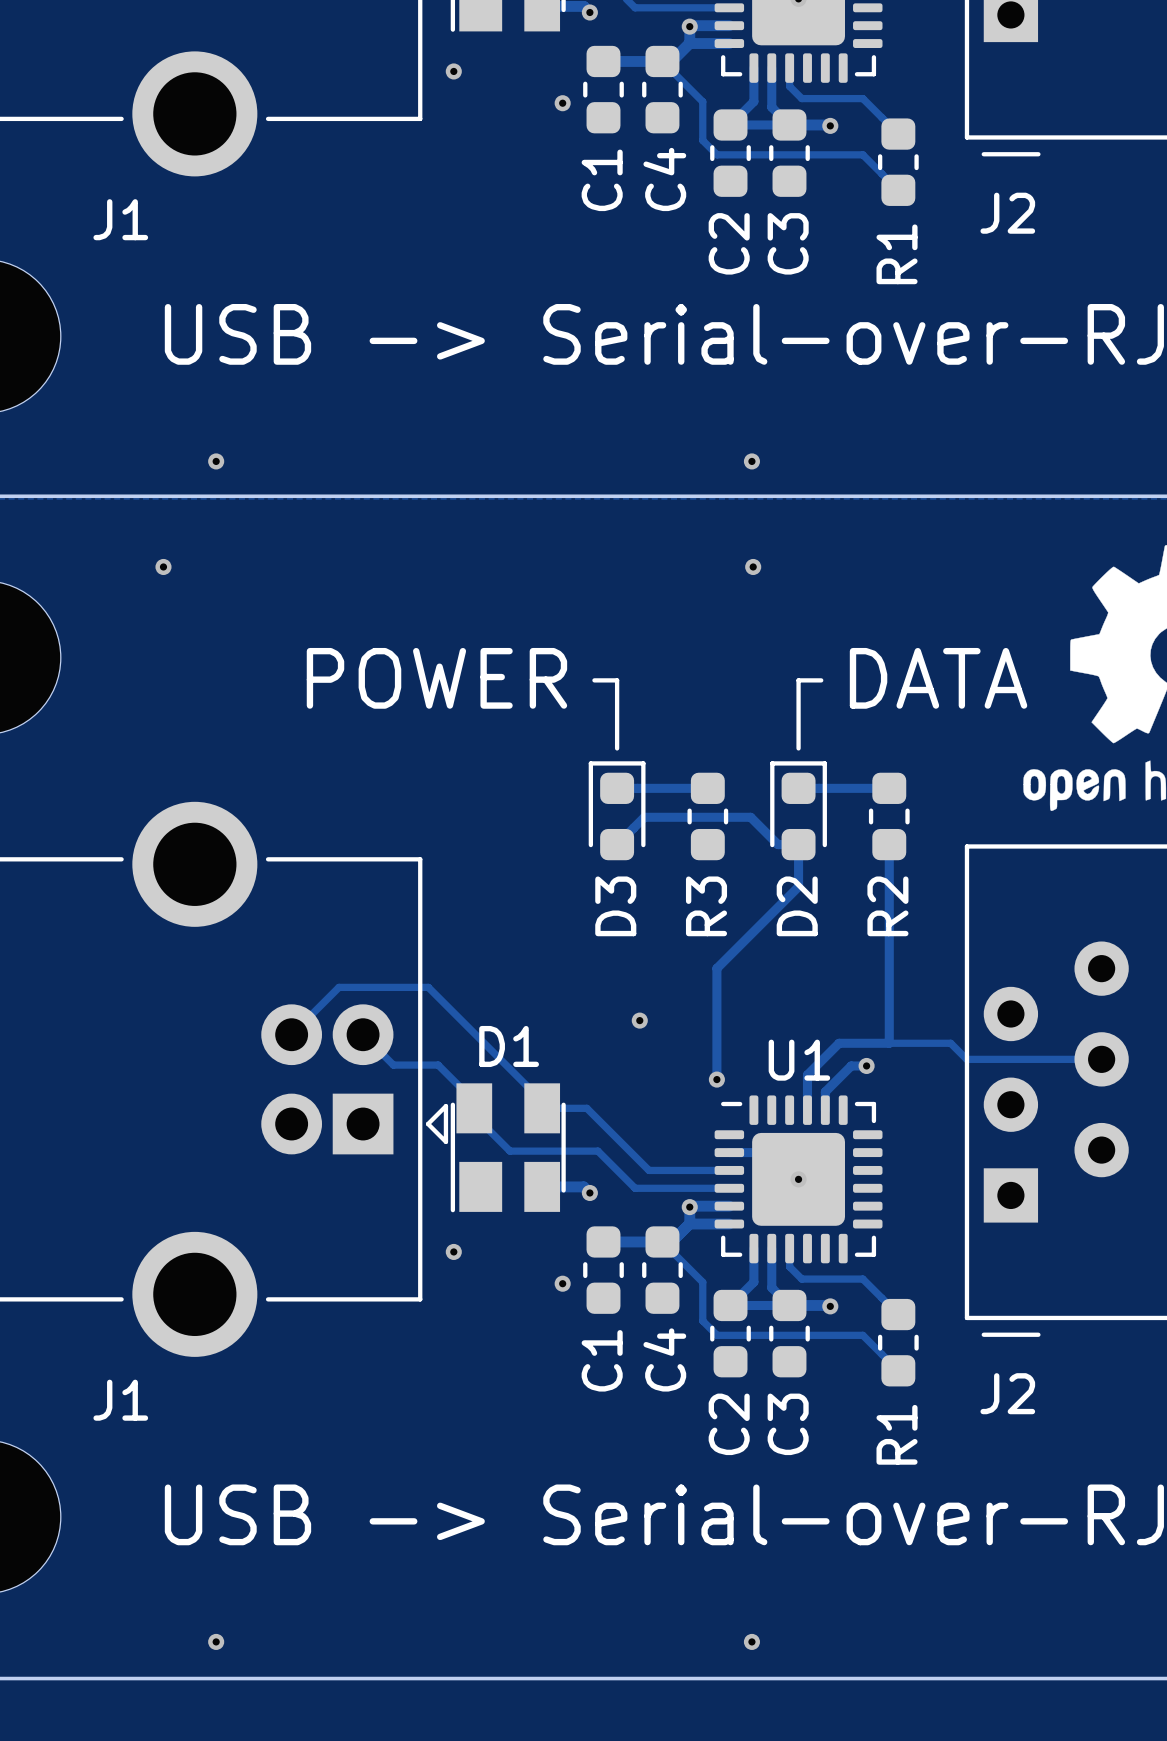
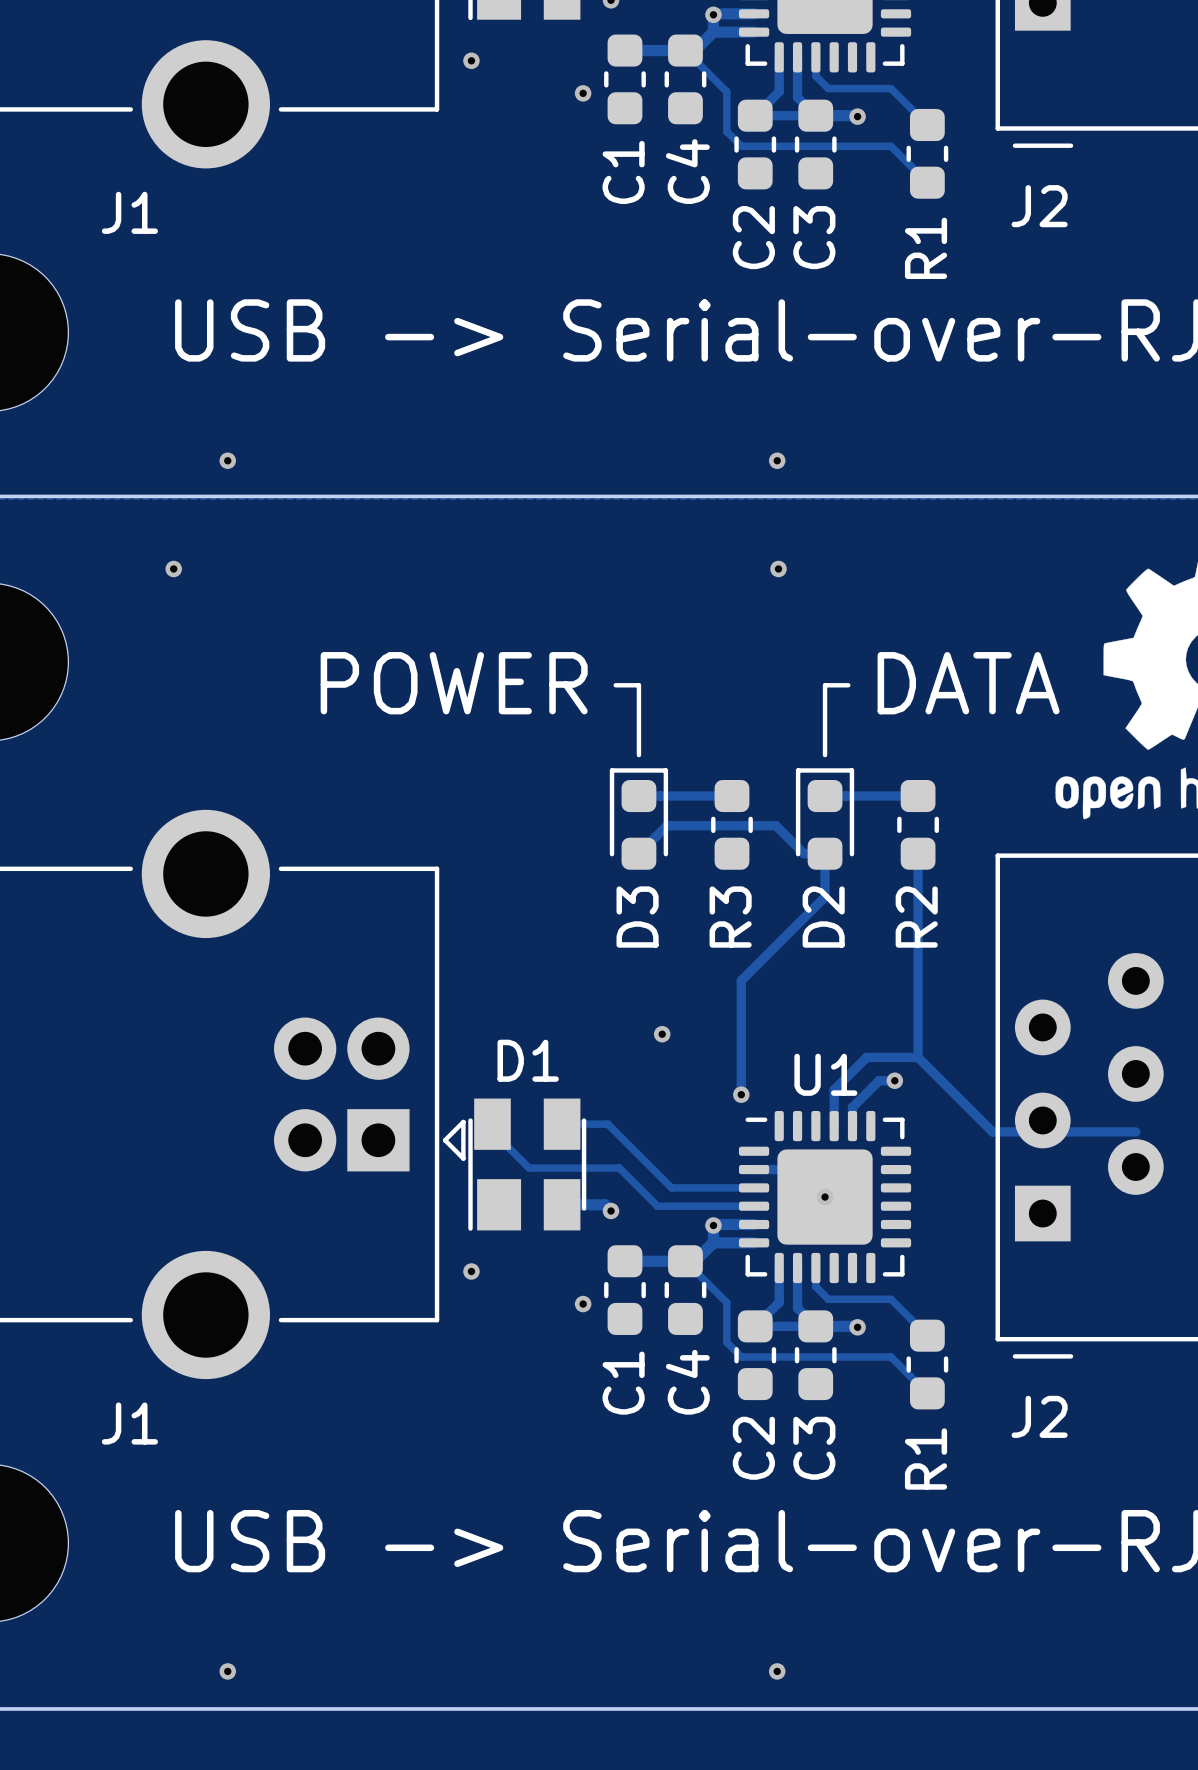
track: (291, 1034) (338, 987) (428, 987) (542, 1101) (542, 1108) -> none
track: (363, 1034) (393, 1065) (438, 1065) (474, 1101) (474, 1108) -> none
track: (889, 1043) (950, 1043) (966, 1059) (1101, 1059) -> (918, 1057) (992, 1131) (1135, 1131)

